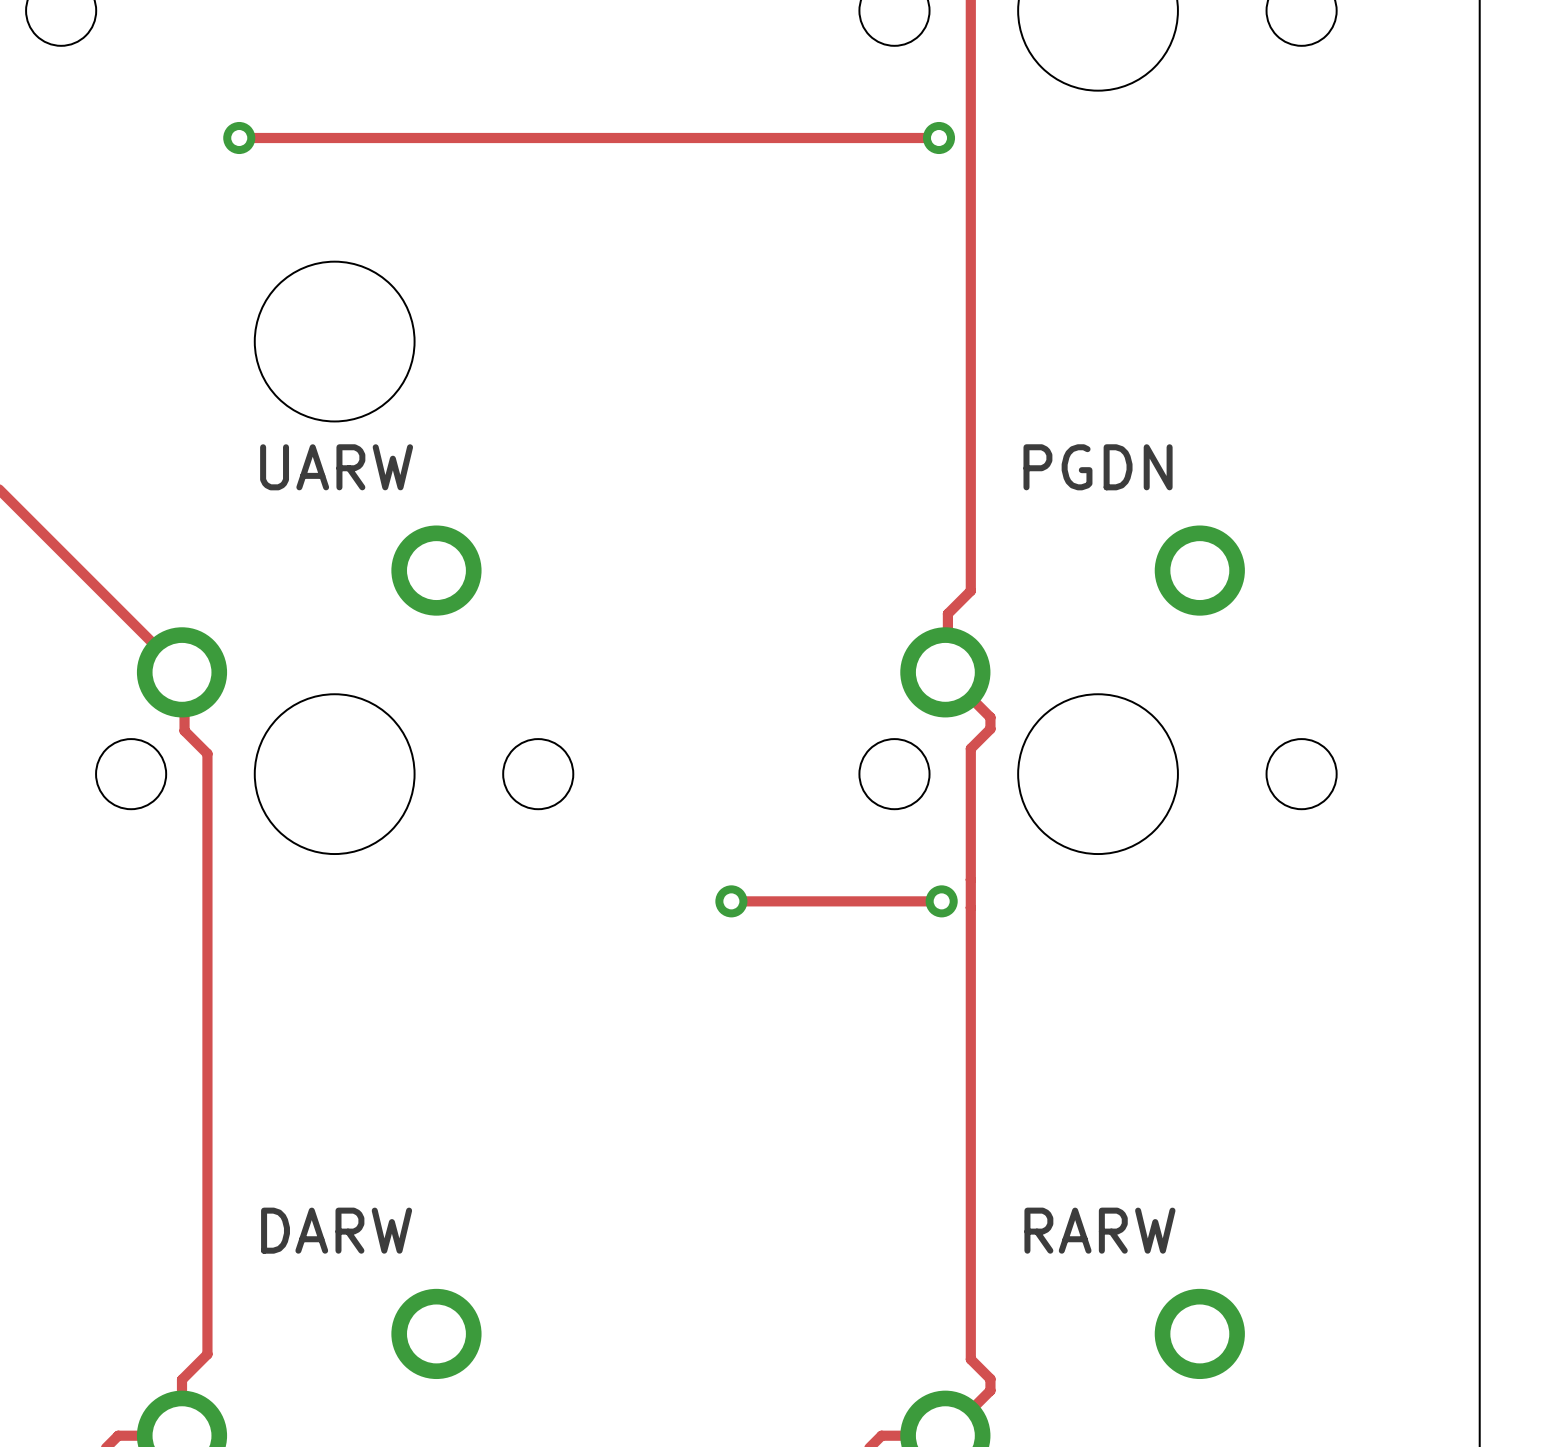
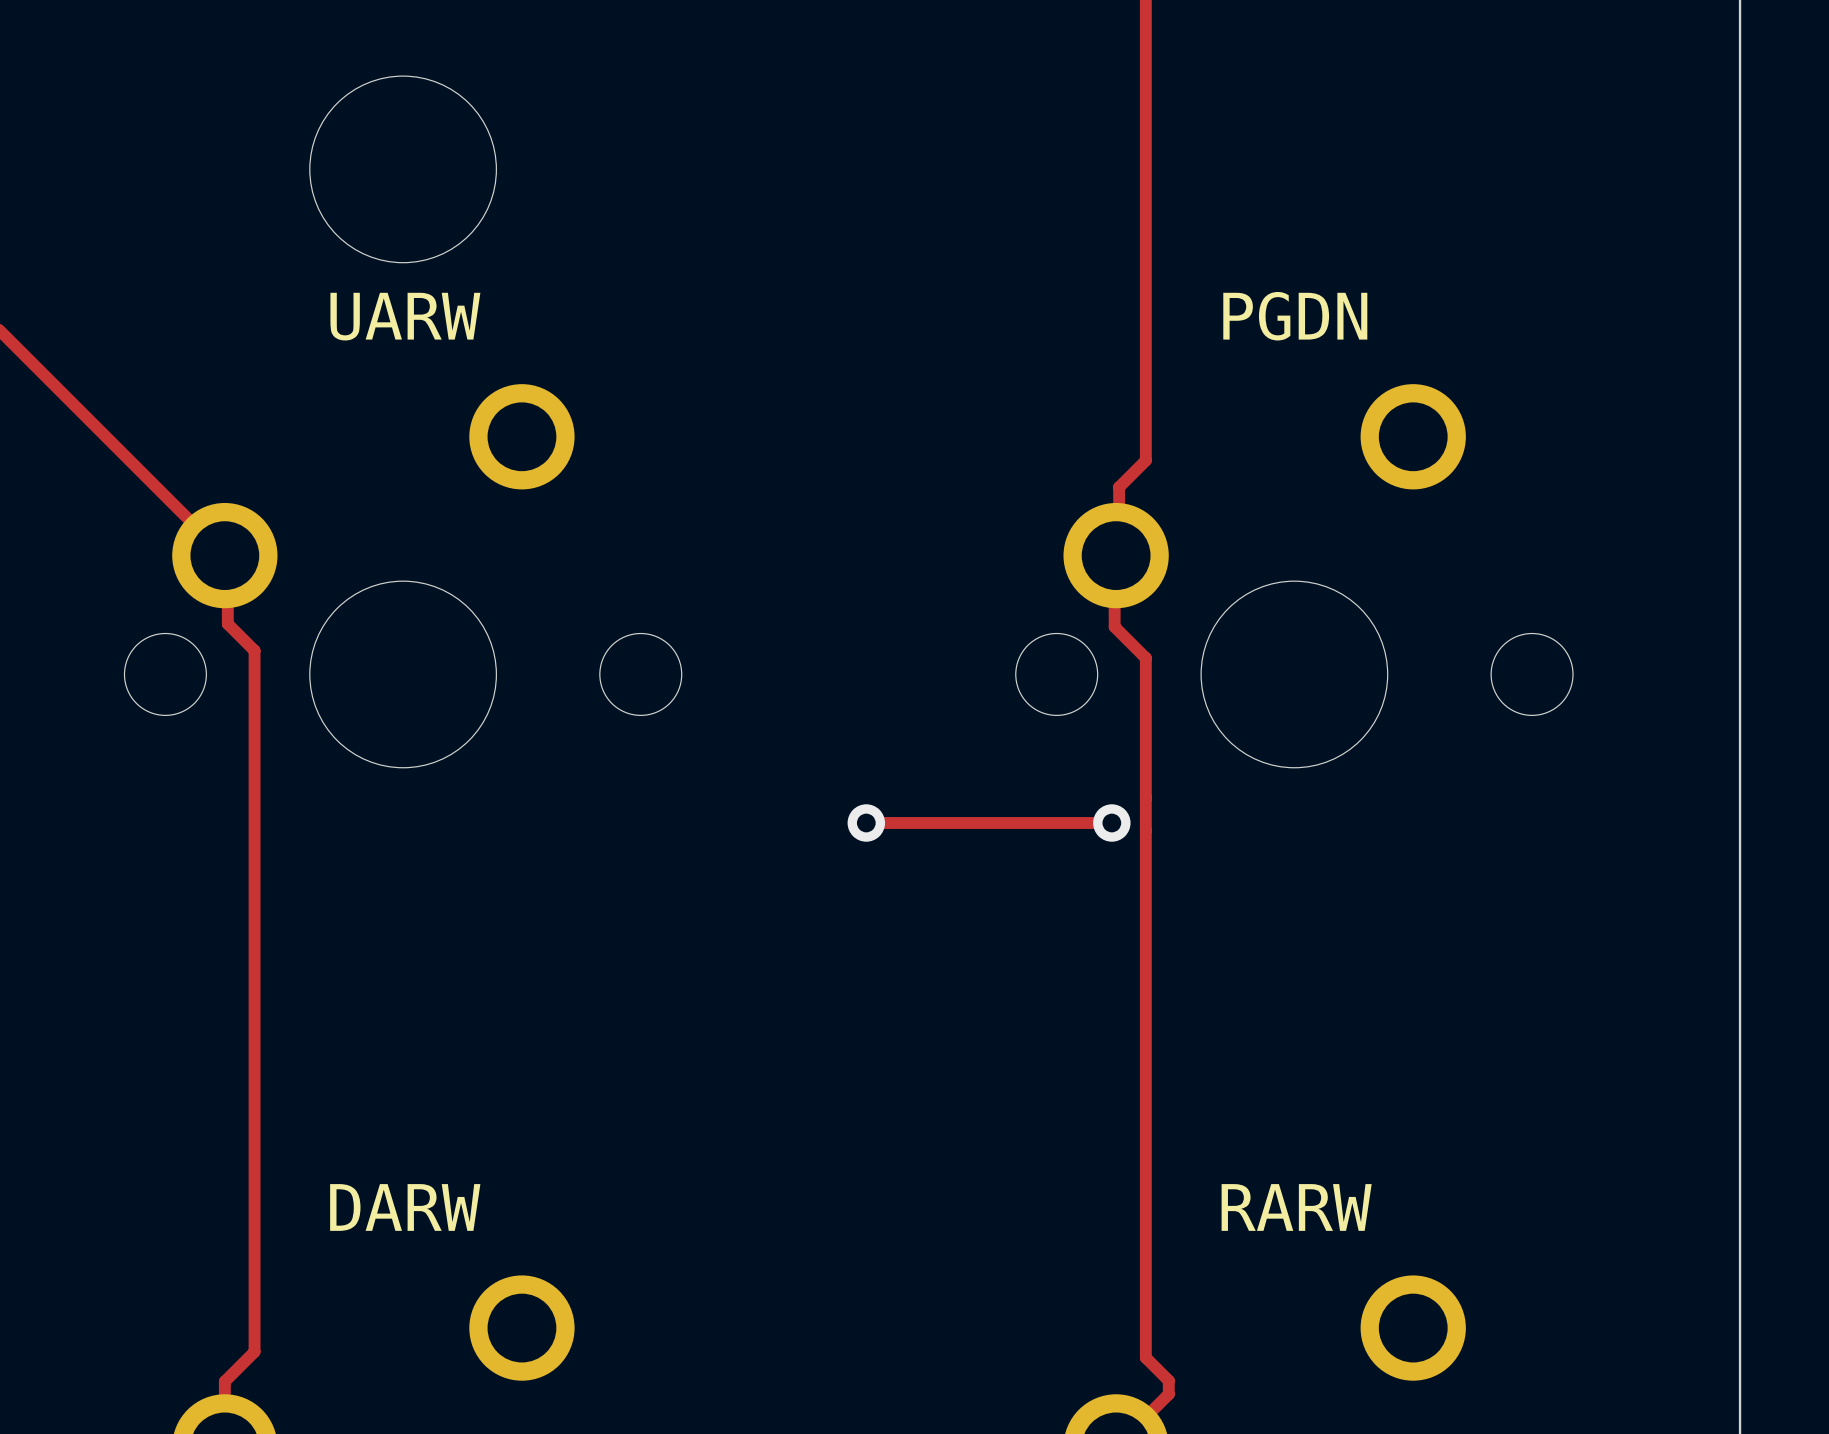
track: (945, 672) (990, 717) (990, 729) (970, 748) (970, 760) -> (1116, 555) (1114, 626) (1145, 658)

